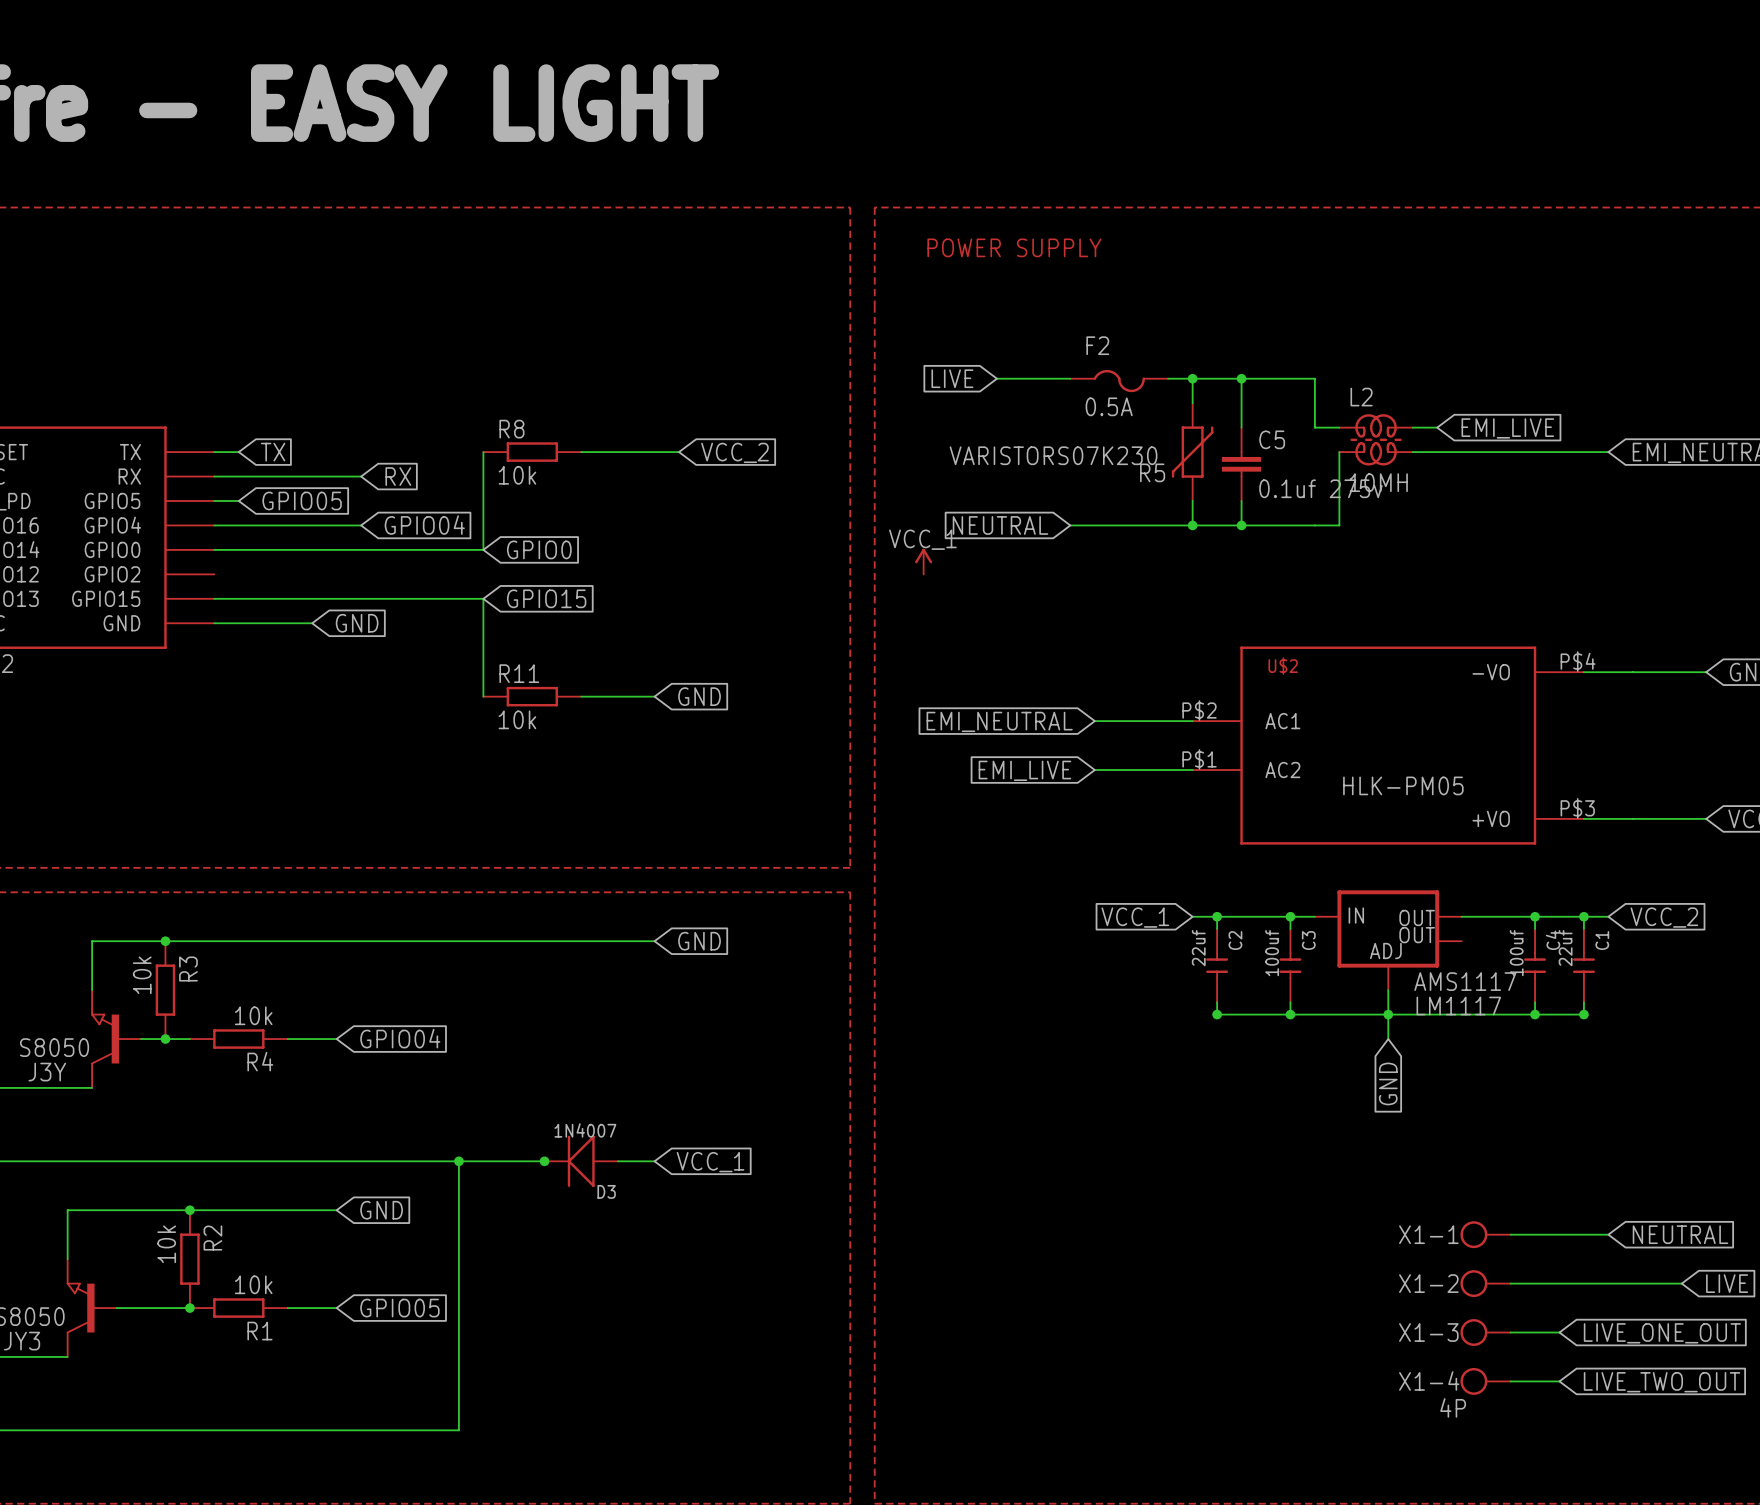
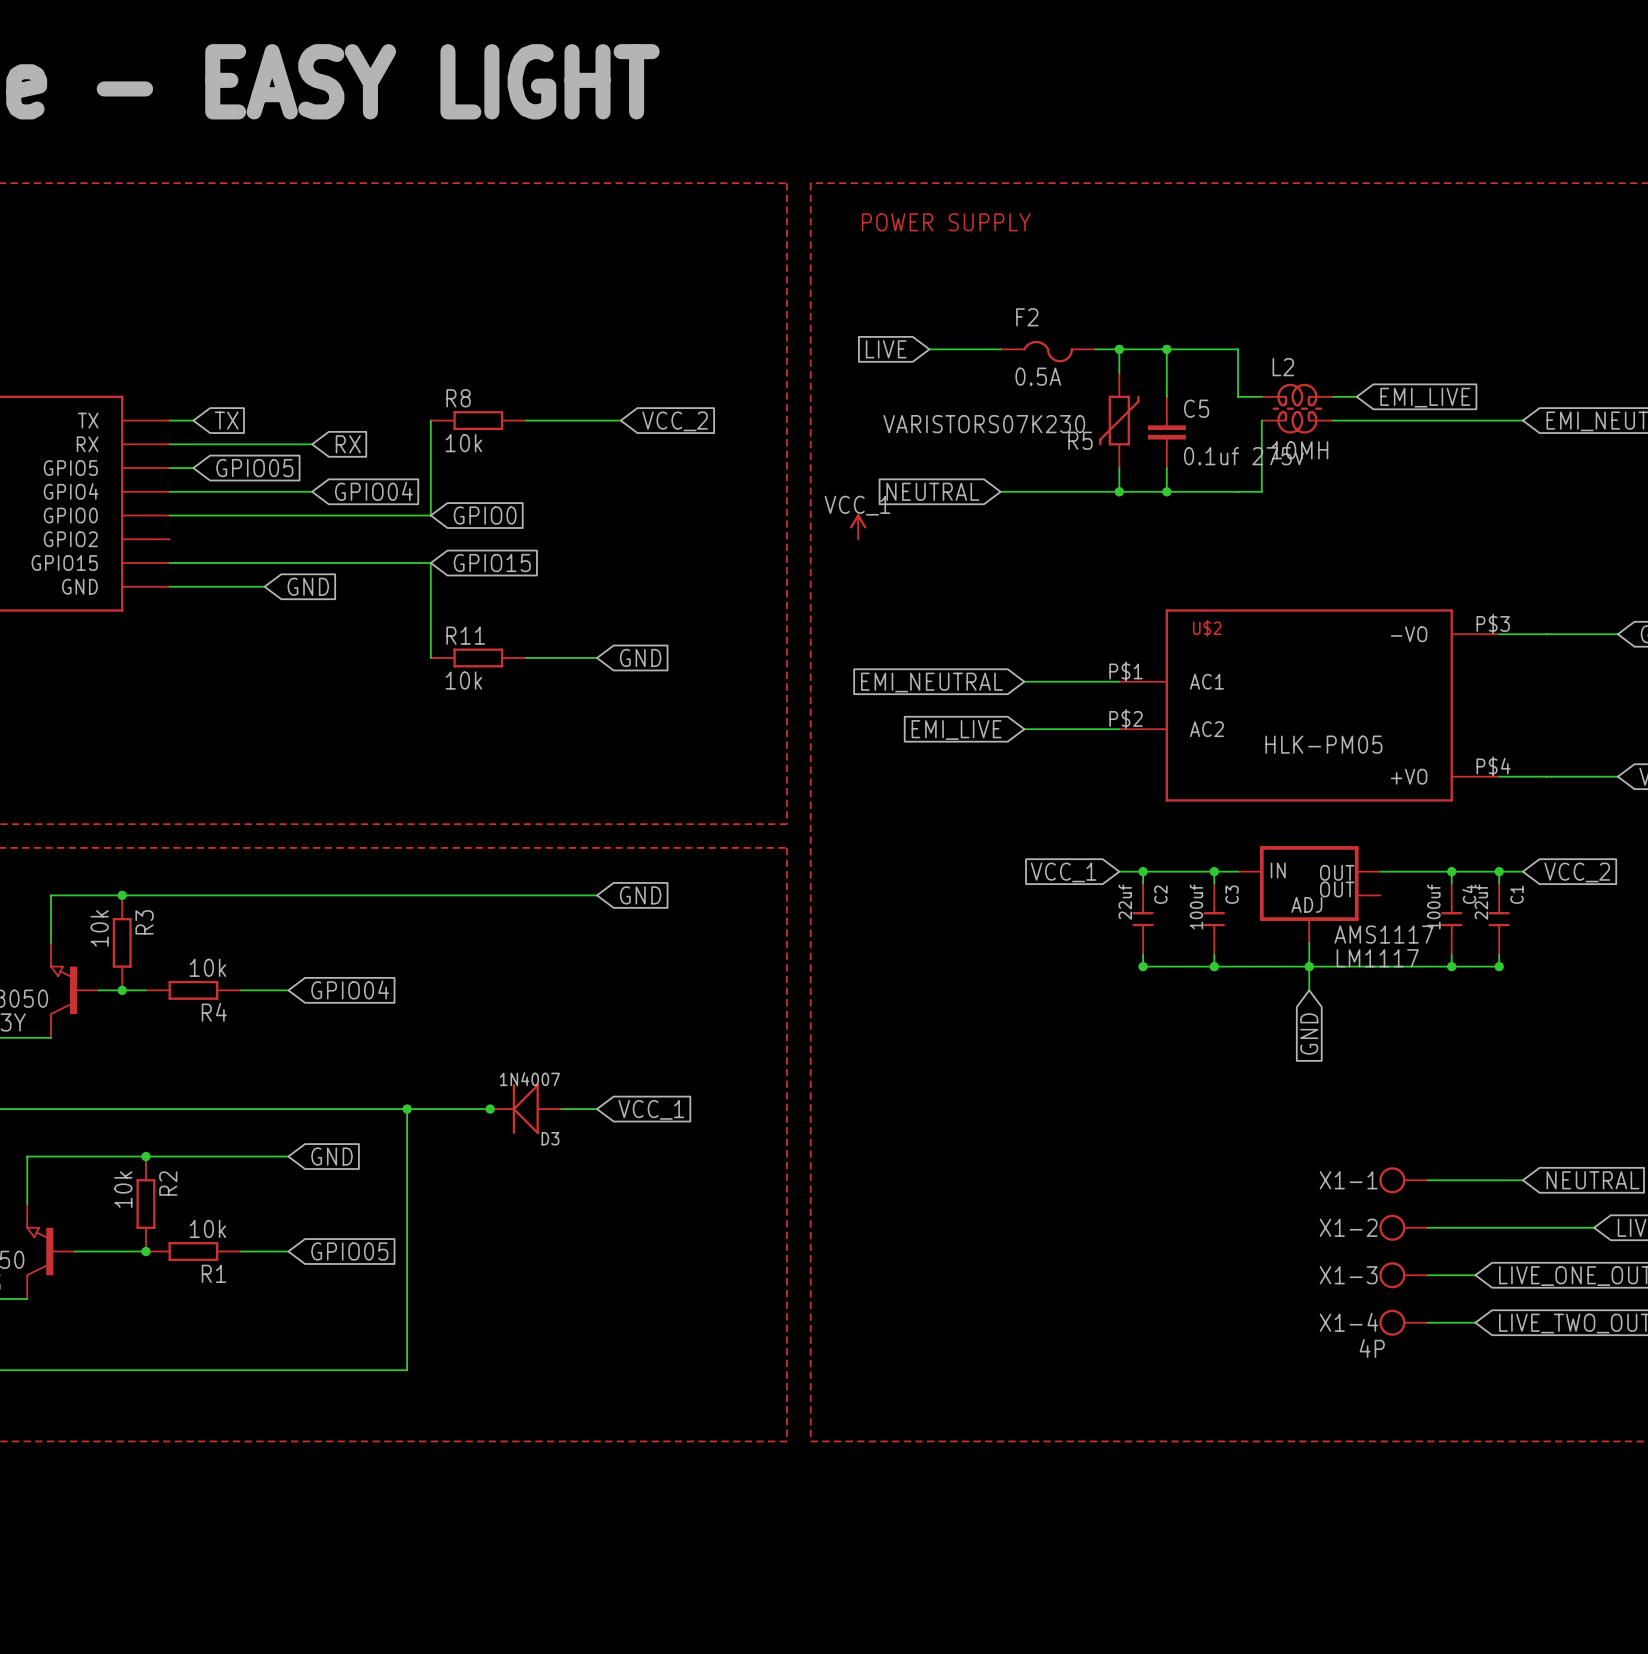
U$2 pin number: P$4 (1578, 661) -> P$3 (1493, 623)
U$2 pin number: P$2 (1199, 710) -> P$1 (1125, 671)
U$2 pin number: P$1 (1199, 759) -> P$2 (1125, 718)
U$2 pin number: P$3 (1577, 808) -> P$4 (1493, 766)

